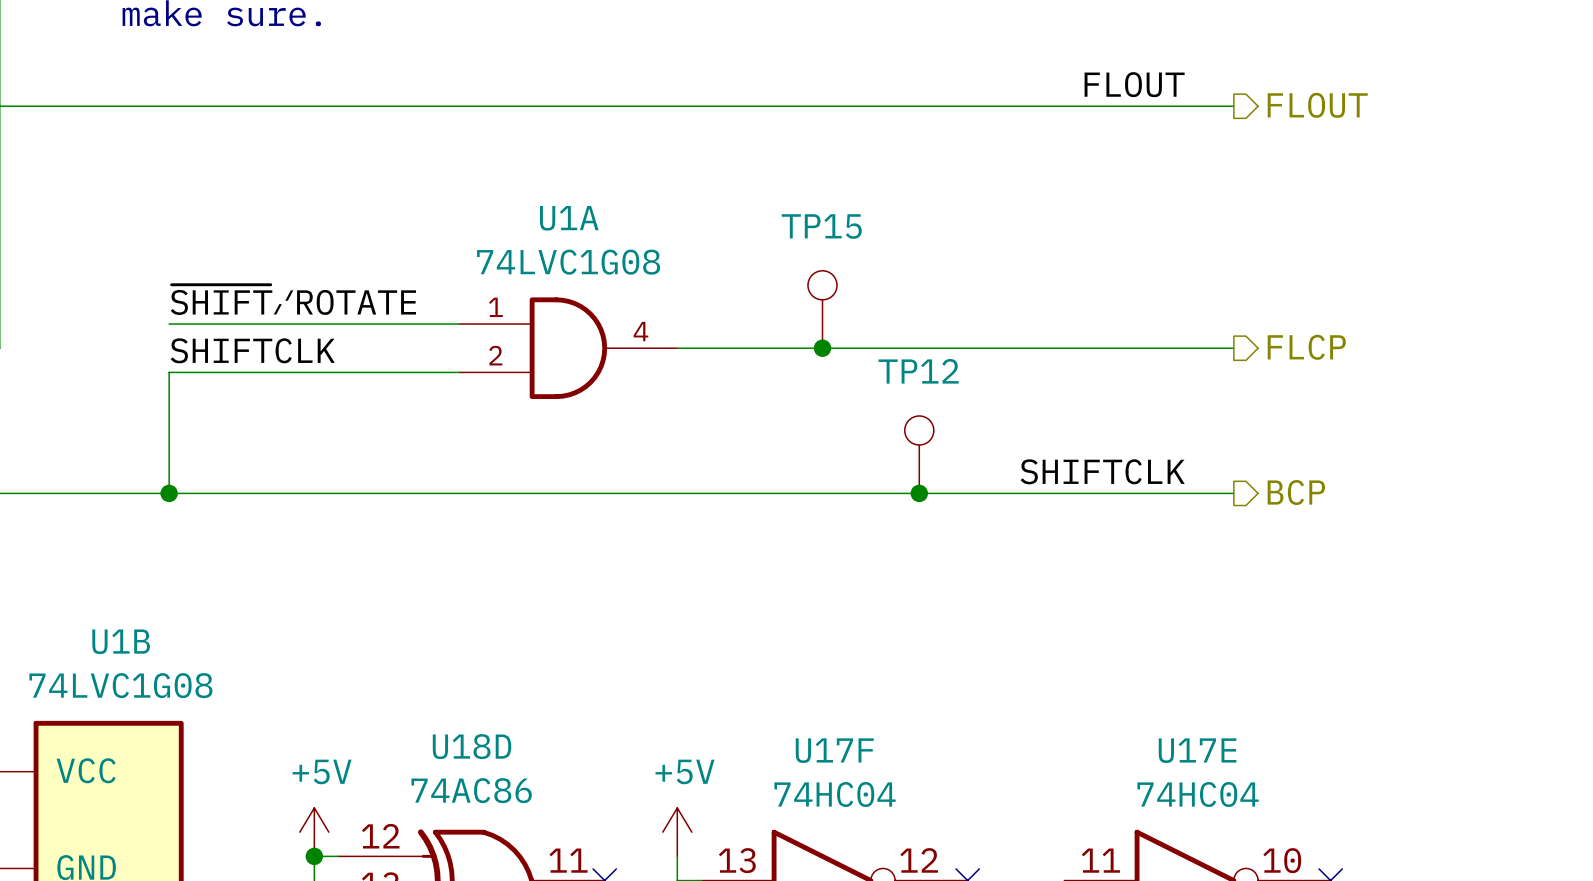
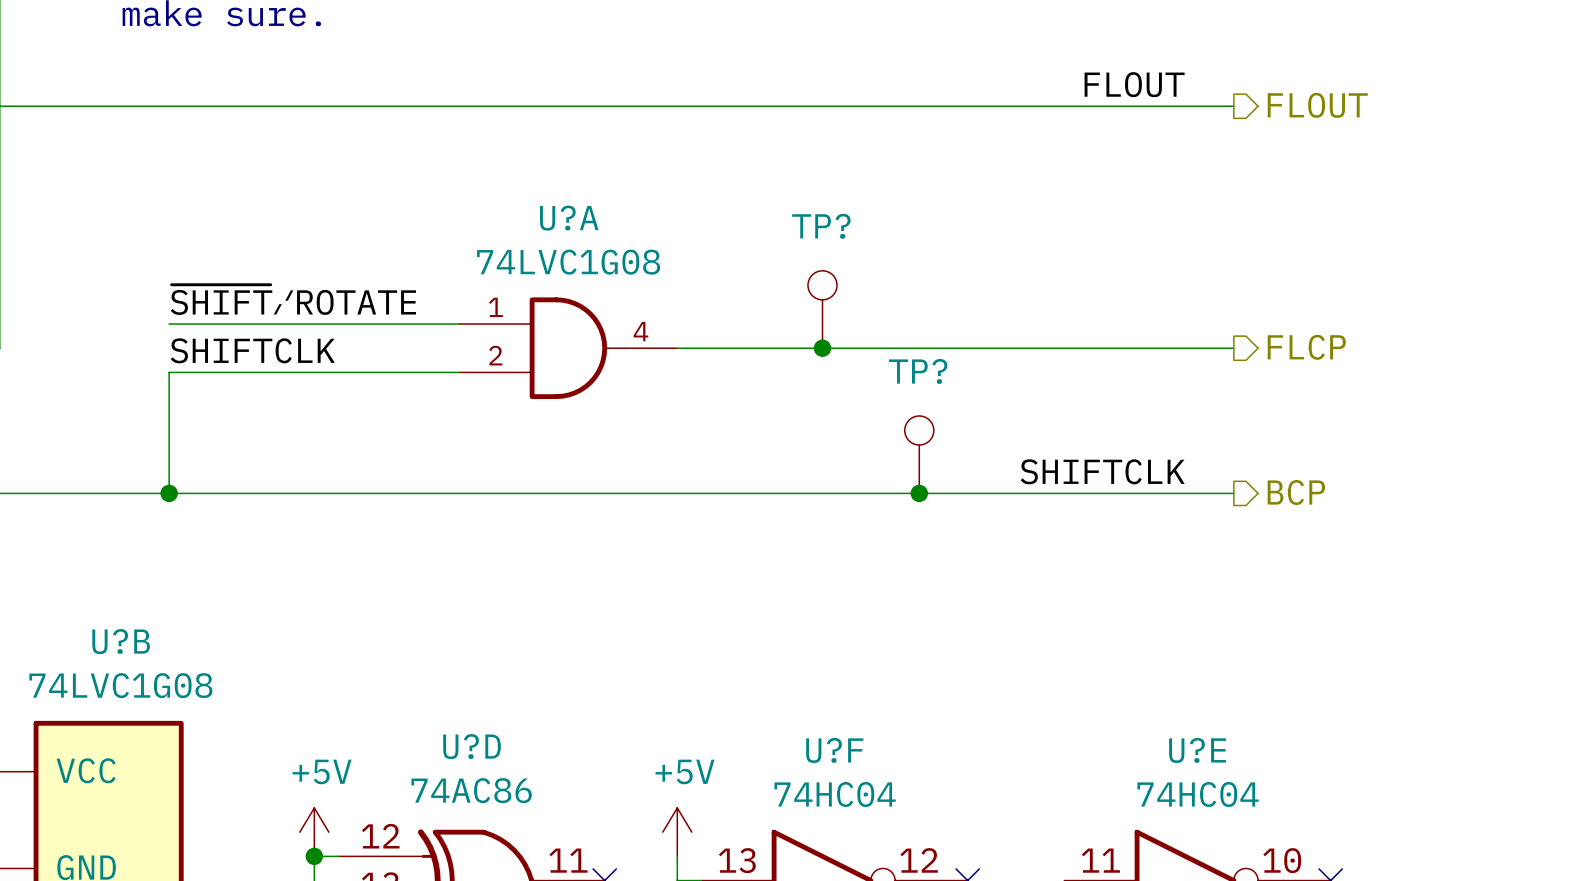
U1A name: U1A (569, 218) -> U?A (569, 218)
TP15 name: TP15 (821, 226) -> TP? (821, 226)
TP12 name: TP12 (918, 371) -> TP? (918, 371)
U1B name: U1B (121, 641) -> U?B (121, 641)
U18D name: U18D (472, 746) -> U?D (472, 746)
U17F name: U17F (834, 750) -> U?F (834, 750)
U17E name: U17E (1197, 750) -> U?E (1197, 750)

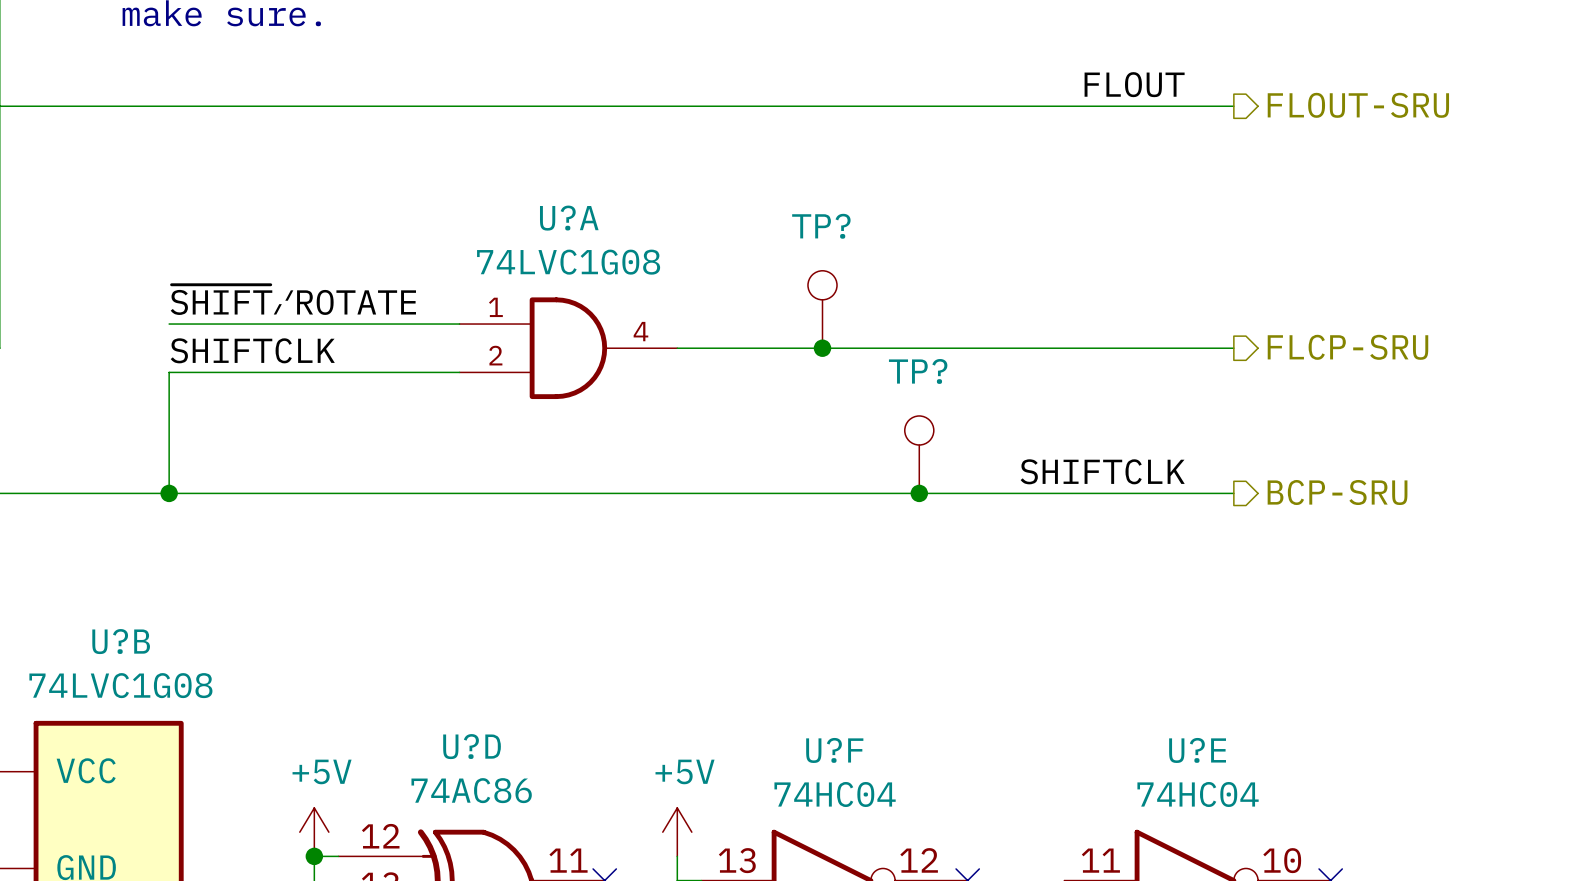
hierarchical label: FLOUT (1317, 105) -> FLOUT-SRU (1358, 105)
hierarchical label: FLCP (1306, 347) -> FLCP-SRU (1347, 347)
hierarchical label: BCP (1296, 492) -> BCP-SRU (1337, 492)

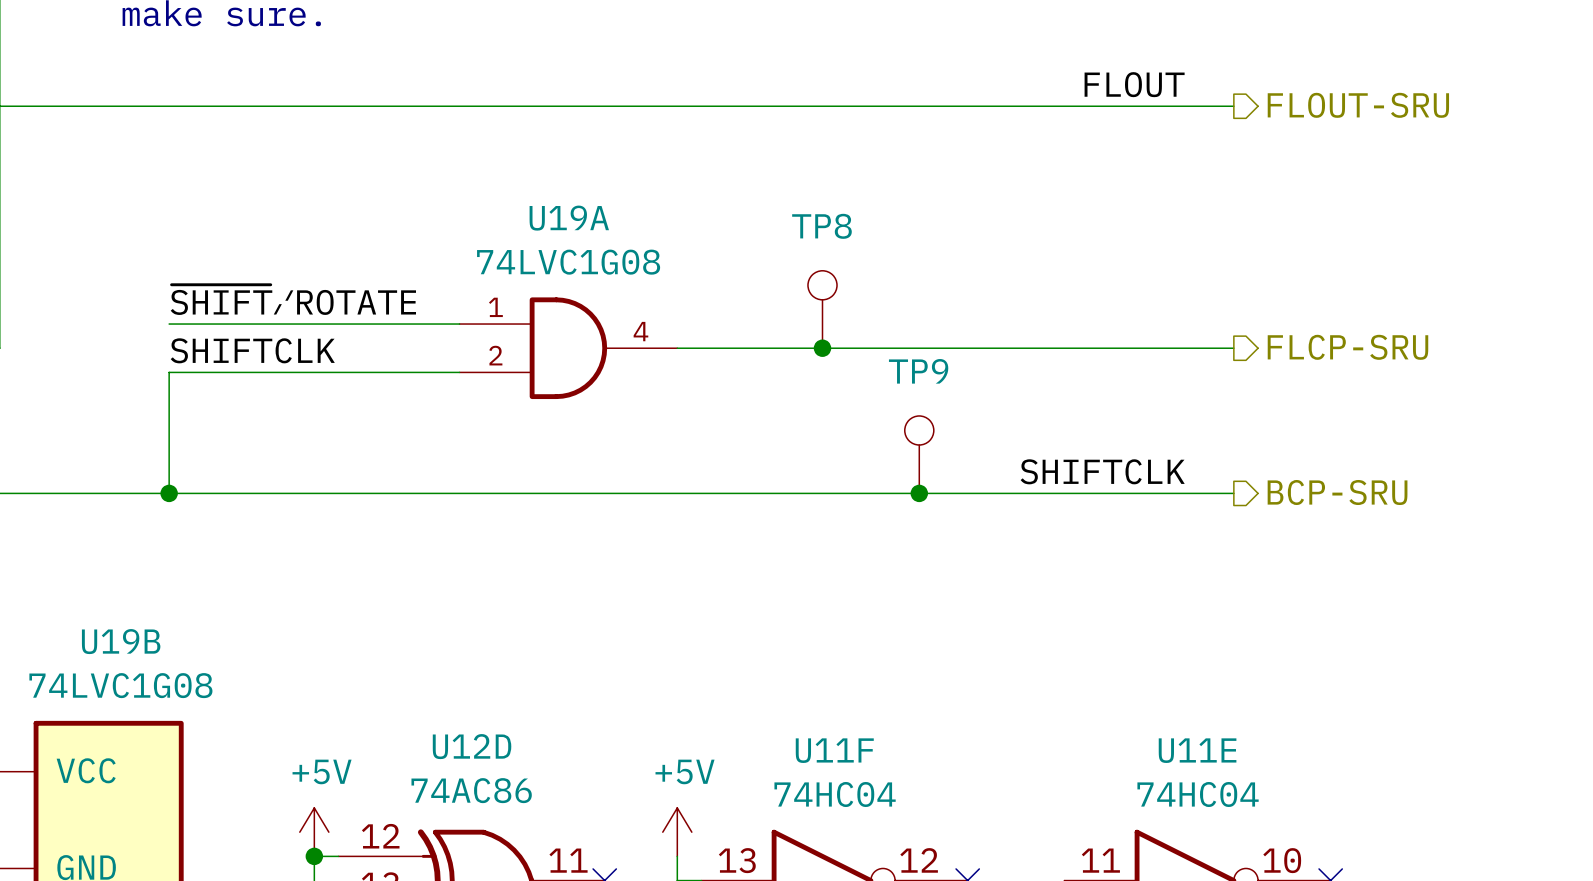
U?A name: U?A (569, 218) -> U19A (569, 218)
TP? name: TP? (821, 226) -> TP8 (821, 226)
TP? name: TP? (918, 371) -> TP9 (918, 371)
U?B name: U?B (121, 641) -> U19B (121, 641)
U?D name: U?D (472, 746) -> U12D (472, 746)
U?F name: U?F (834, 750) -> U11F (834, 750)
U?E name: U?E (1197, 750) -> U11E (1197, 750)

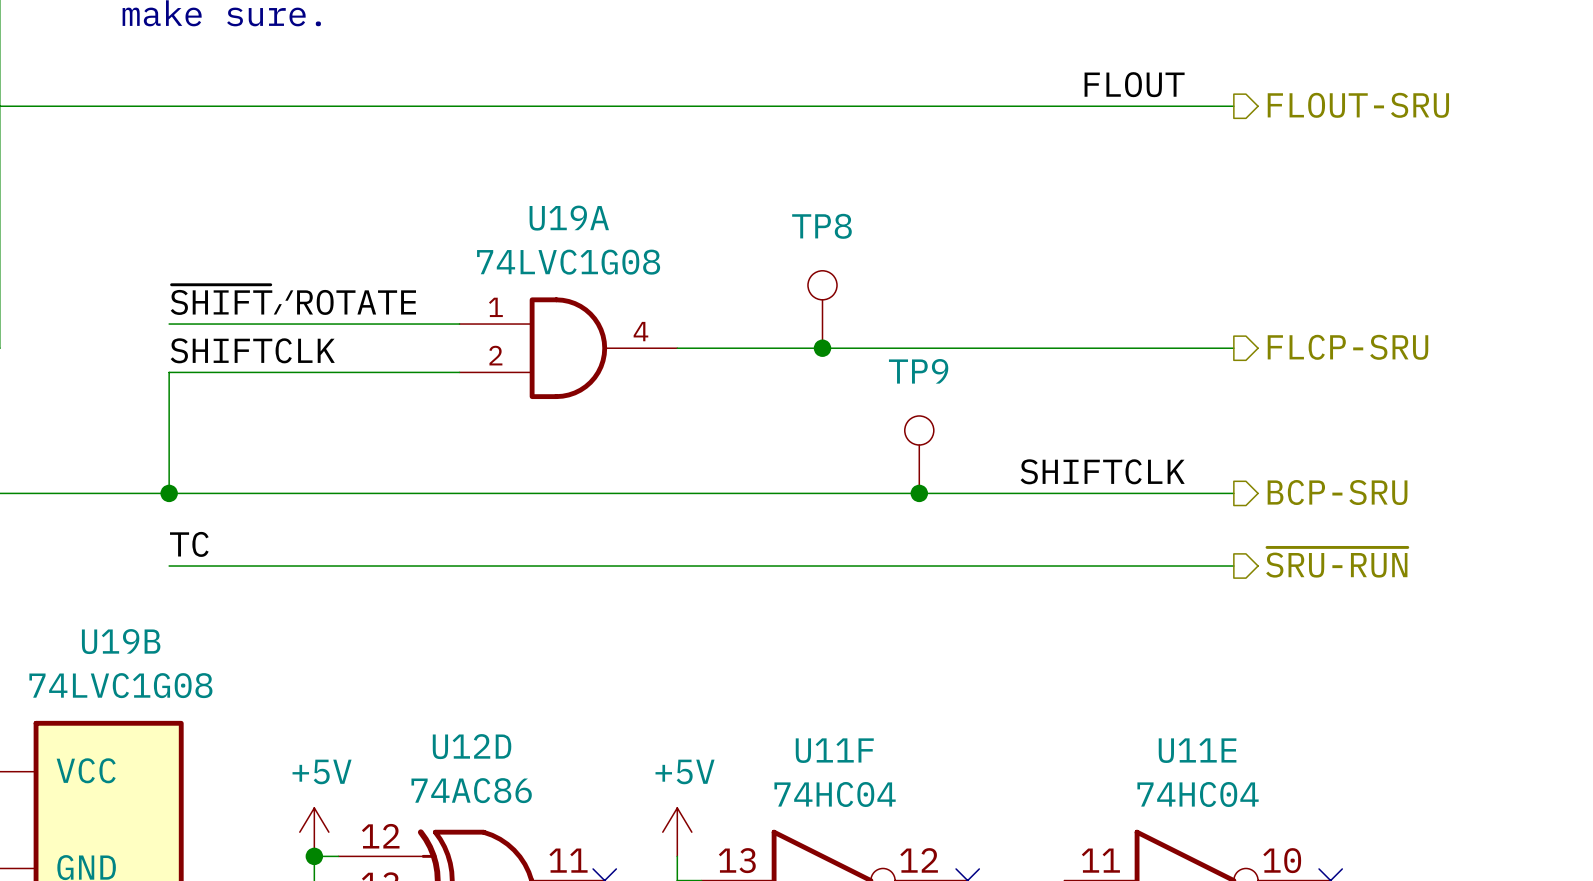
label: none -> TC (189, 544)
hierarchical label: none -> ~{SRU-RUN} (1336, 562)
wire: none -> (169, 566) (1233, 566)

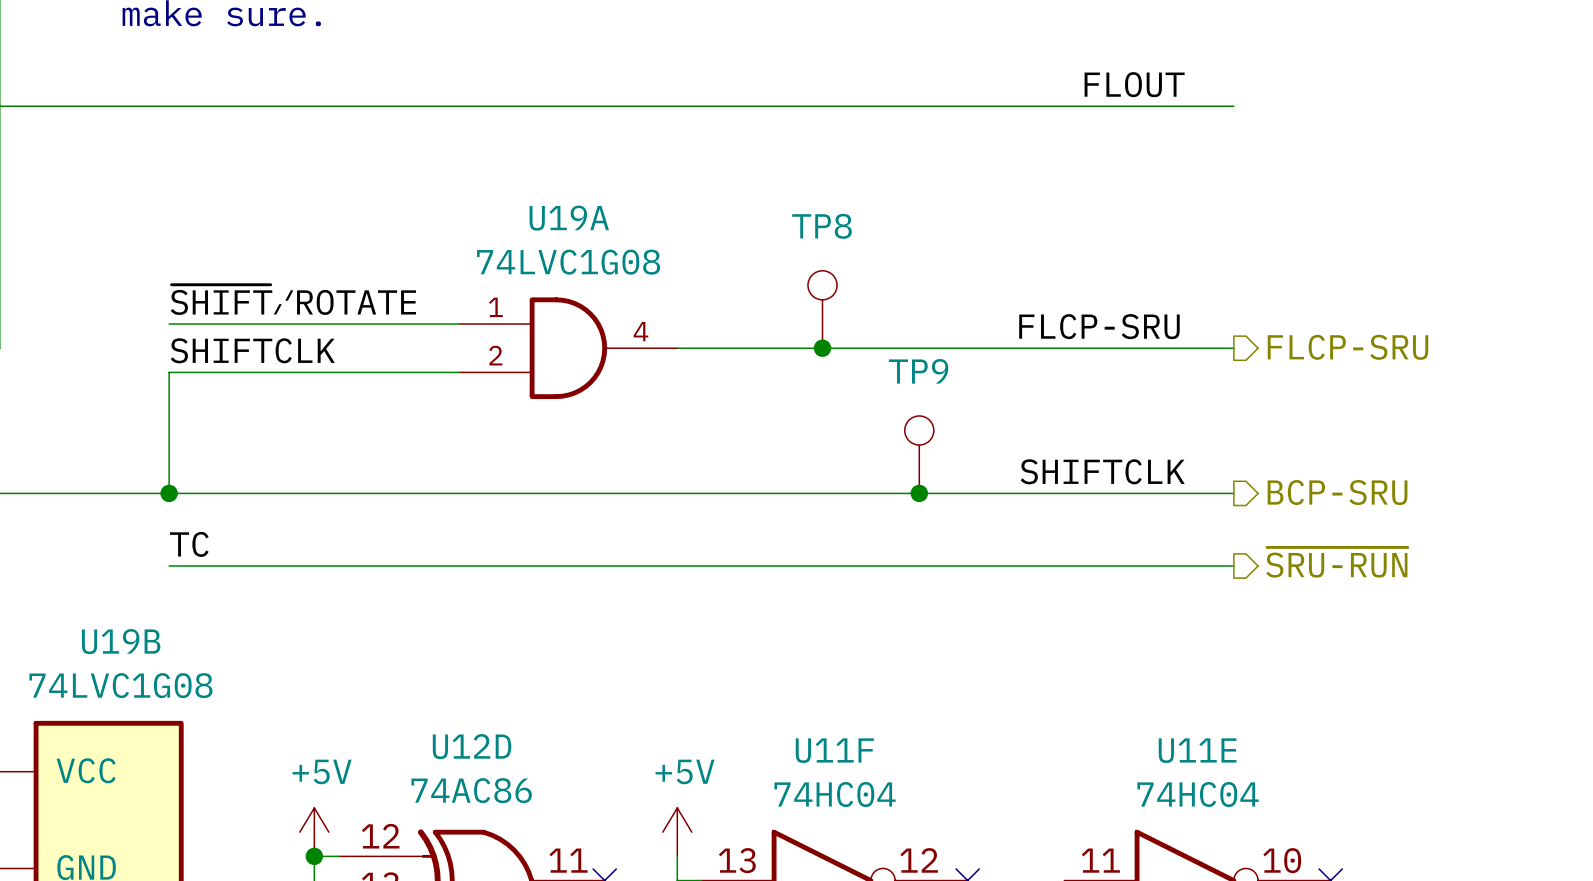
hierarchical label: FLOUT-SRU (1358, 105) -> none
label: none -> FLCP-SRU (1099, 326)

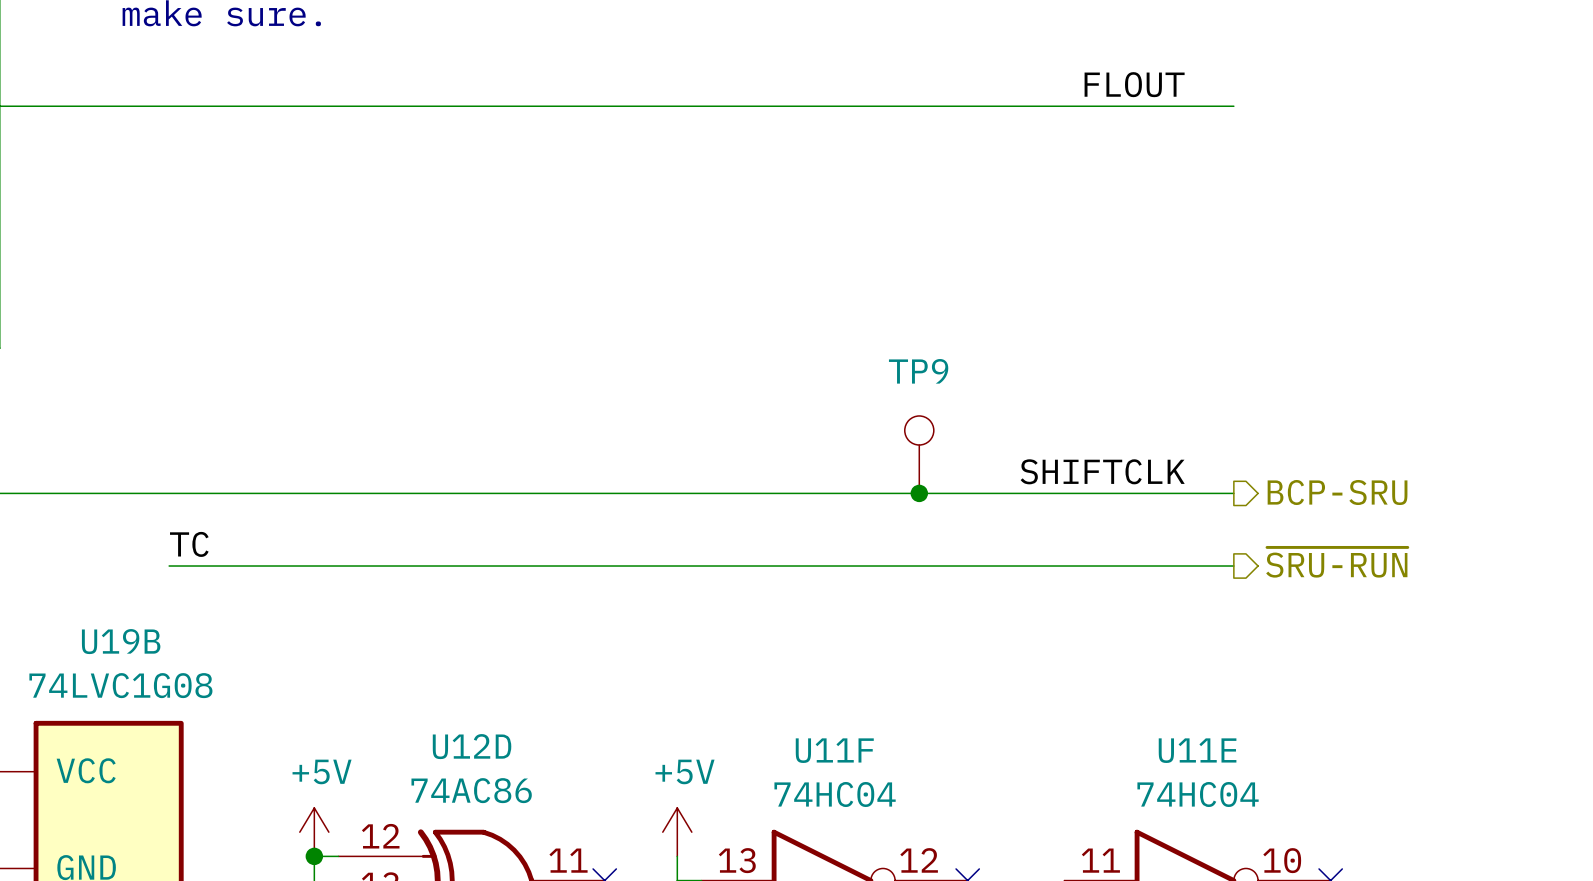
label: ~{SHIFT}∕ROTATE (293, 299) -> none
TP8: (822, 309) -> none
wire: (169, 324) (459, 324) -> none
label: FLCP-SRU (1099, 326) -> none
hierarchical label: FLCP-SRU (1347, 347) -> none
U19A: 74LVC1G08 (568, 348) -> none
wire: (677, 348) (1233, 348) -> none
junction: (822, 348) -> none
label: SHIFTCLK (252, 350) -> none
wire: (459, 372) (169, 372) (169, 493) -> none
junction: (169, 493) -> none

